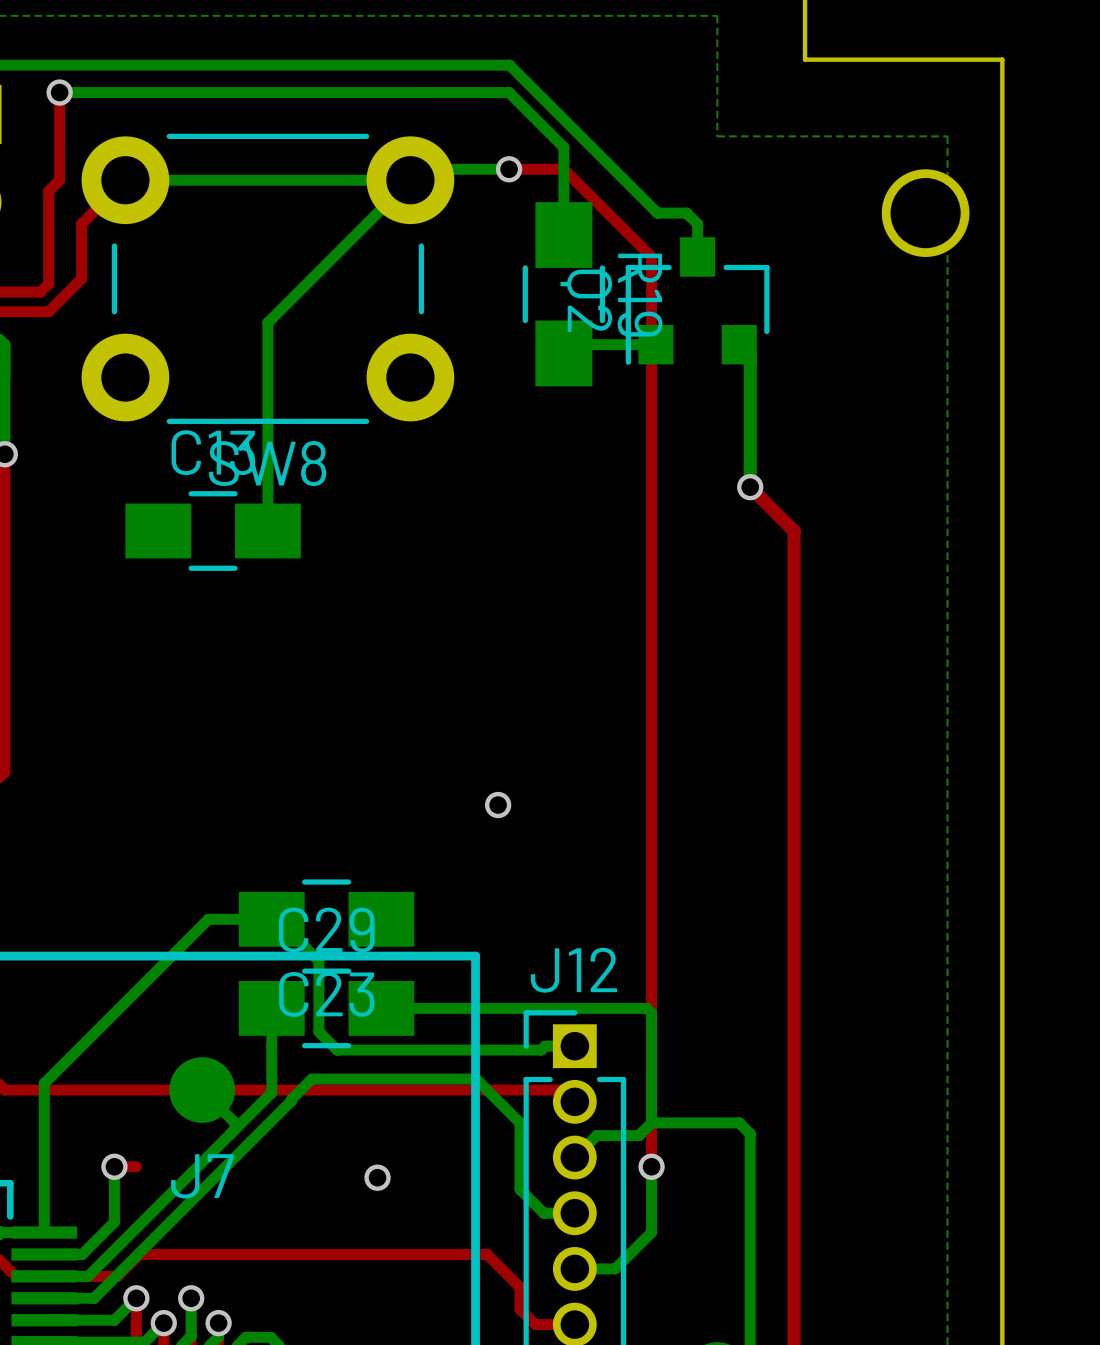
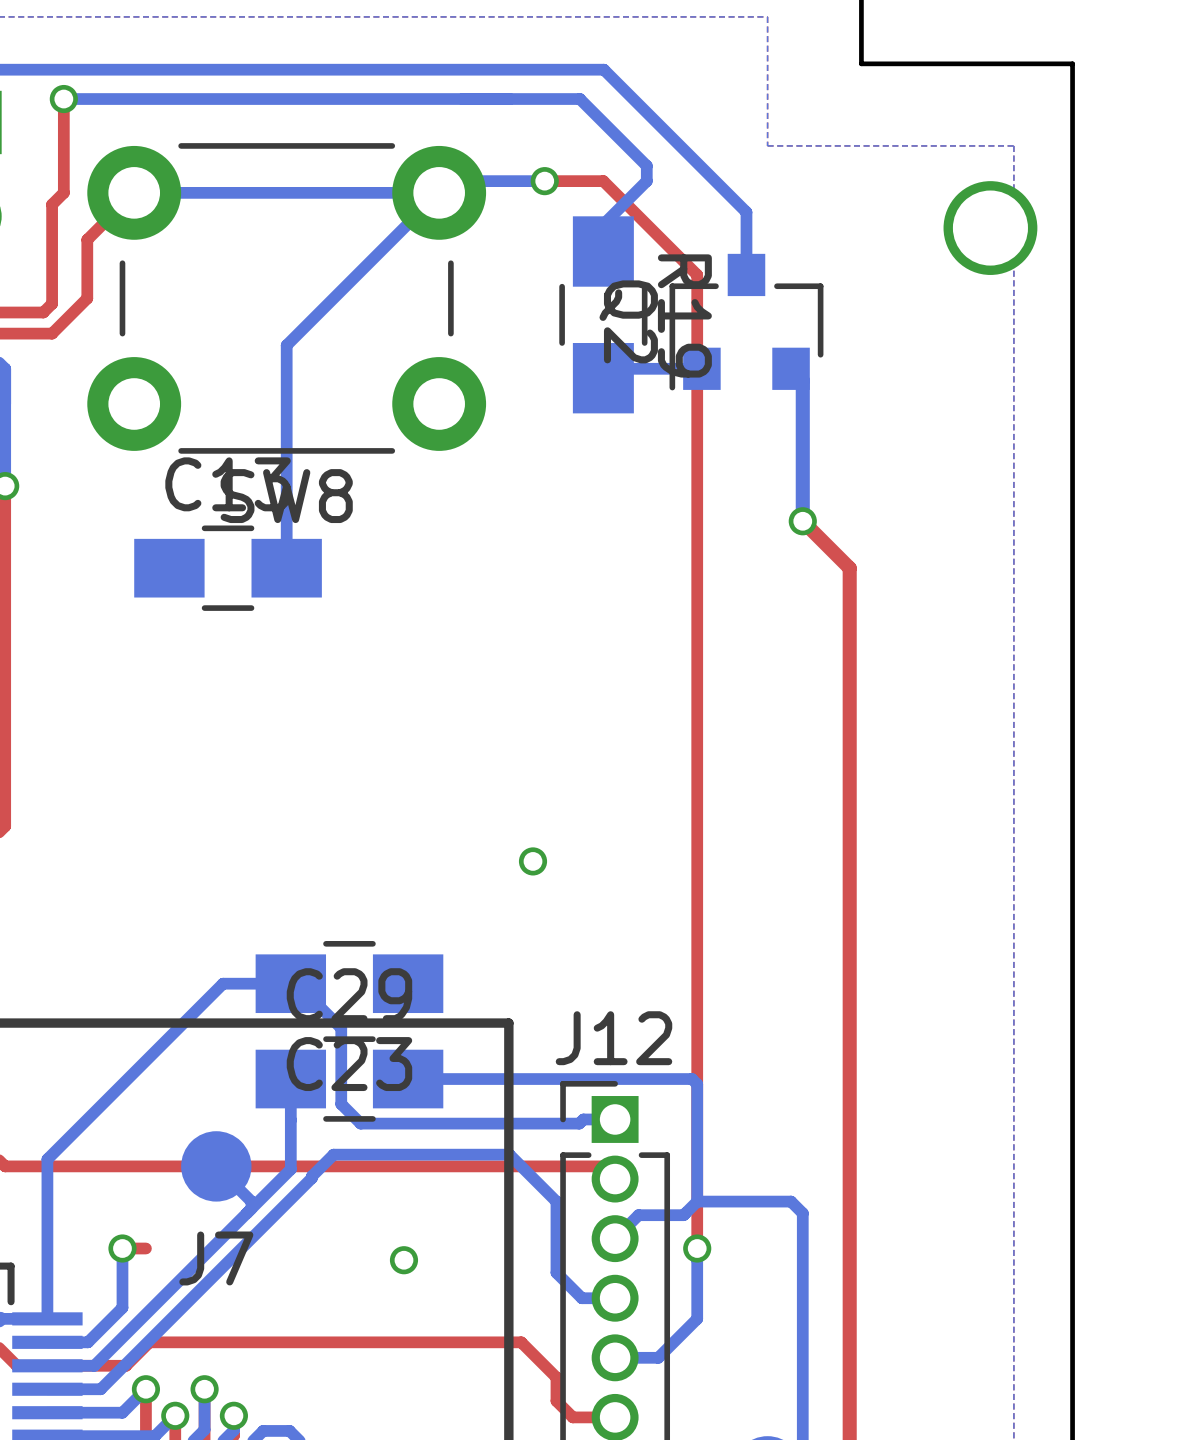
bottom track: (509, 65) (657, 213) (686, 213) (697, 224) -> (545, 69) (603, 69) (746, 212) (746, 239)
bottom track: (509, 92) (563, 147) (563, 209) -> (544, 99) (579, 99) (646, 165) (646, 181) (603, 224)

